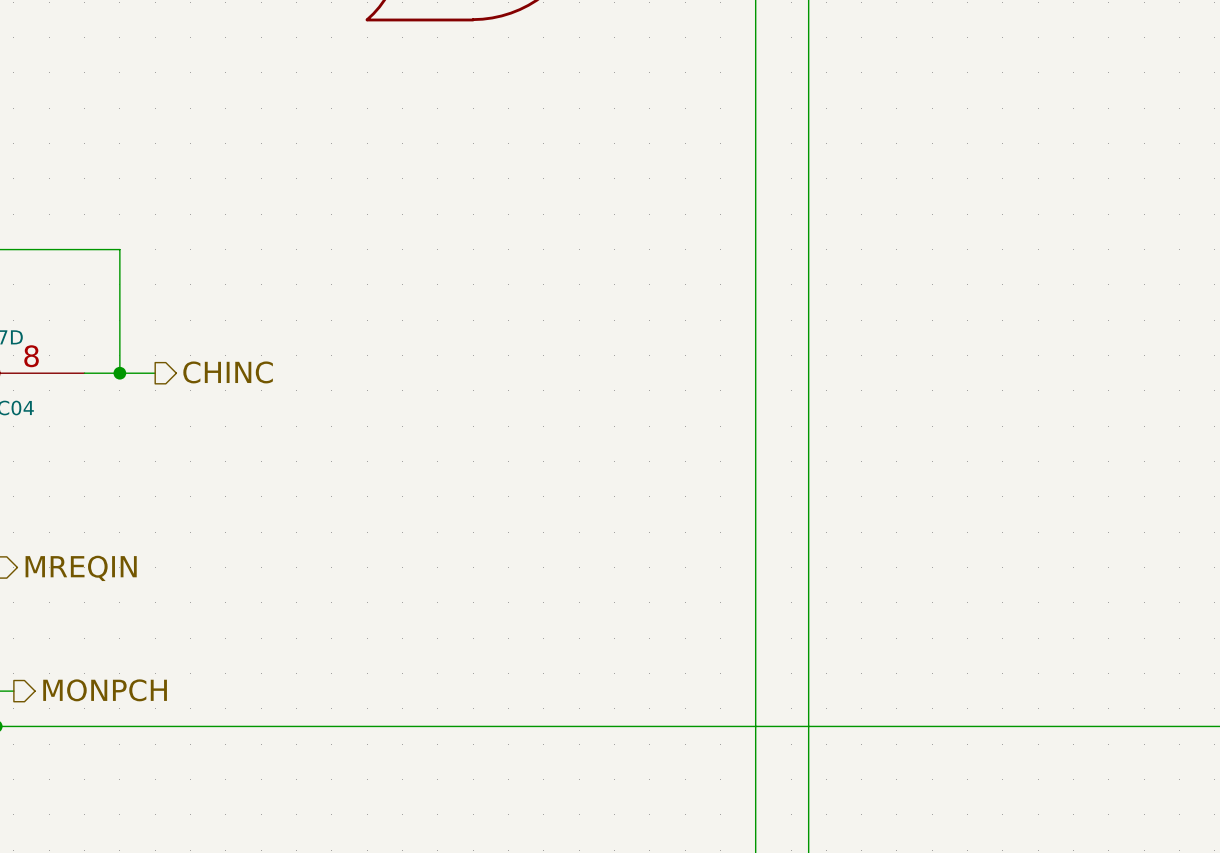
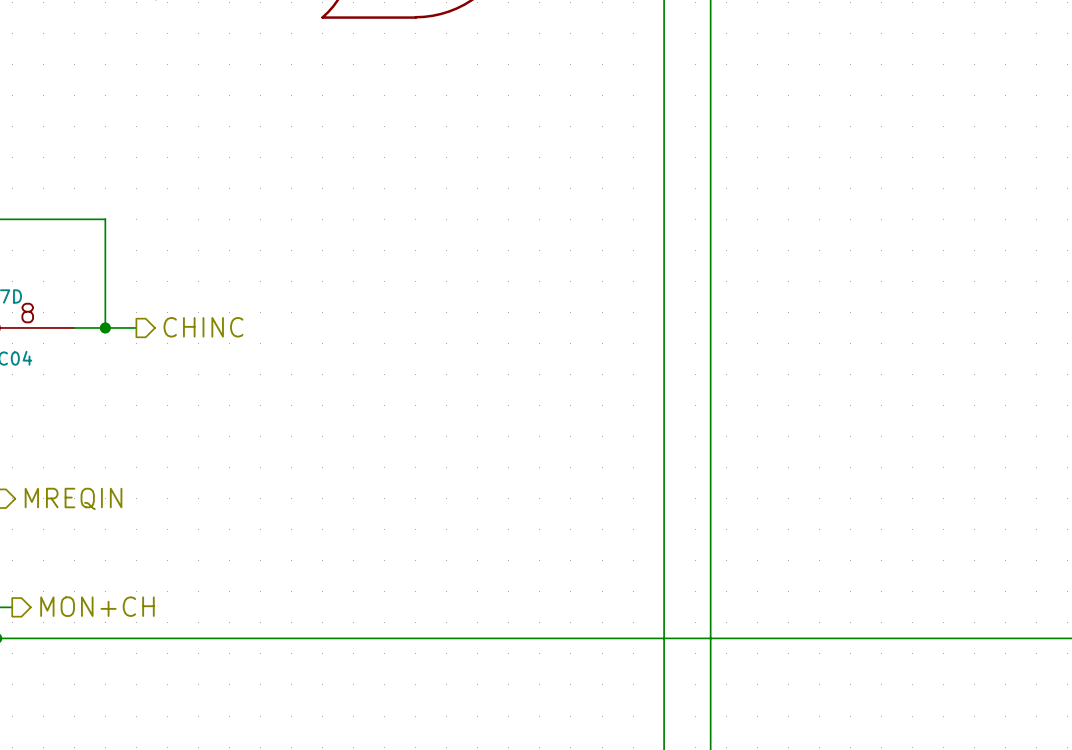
hierarchical label: MONPCH (105, 690) -> MON+CH (97, 606)

